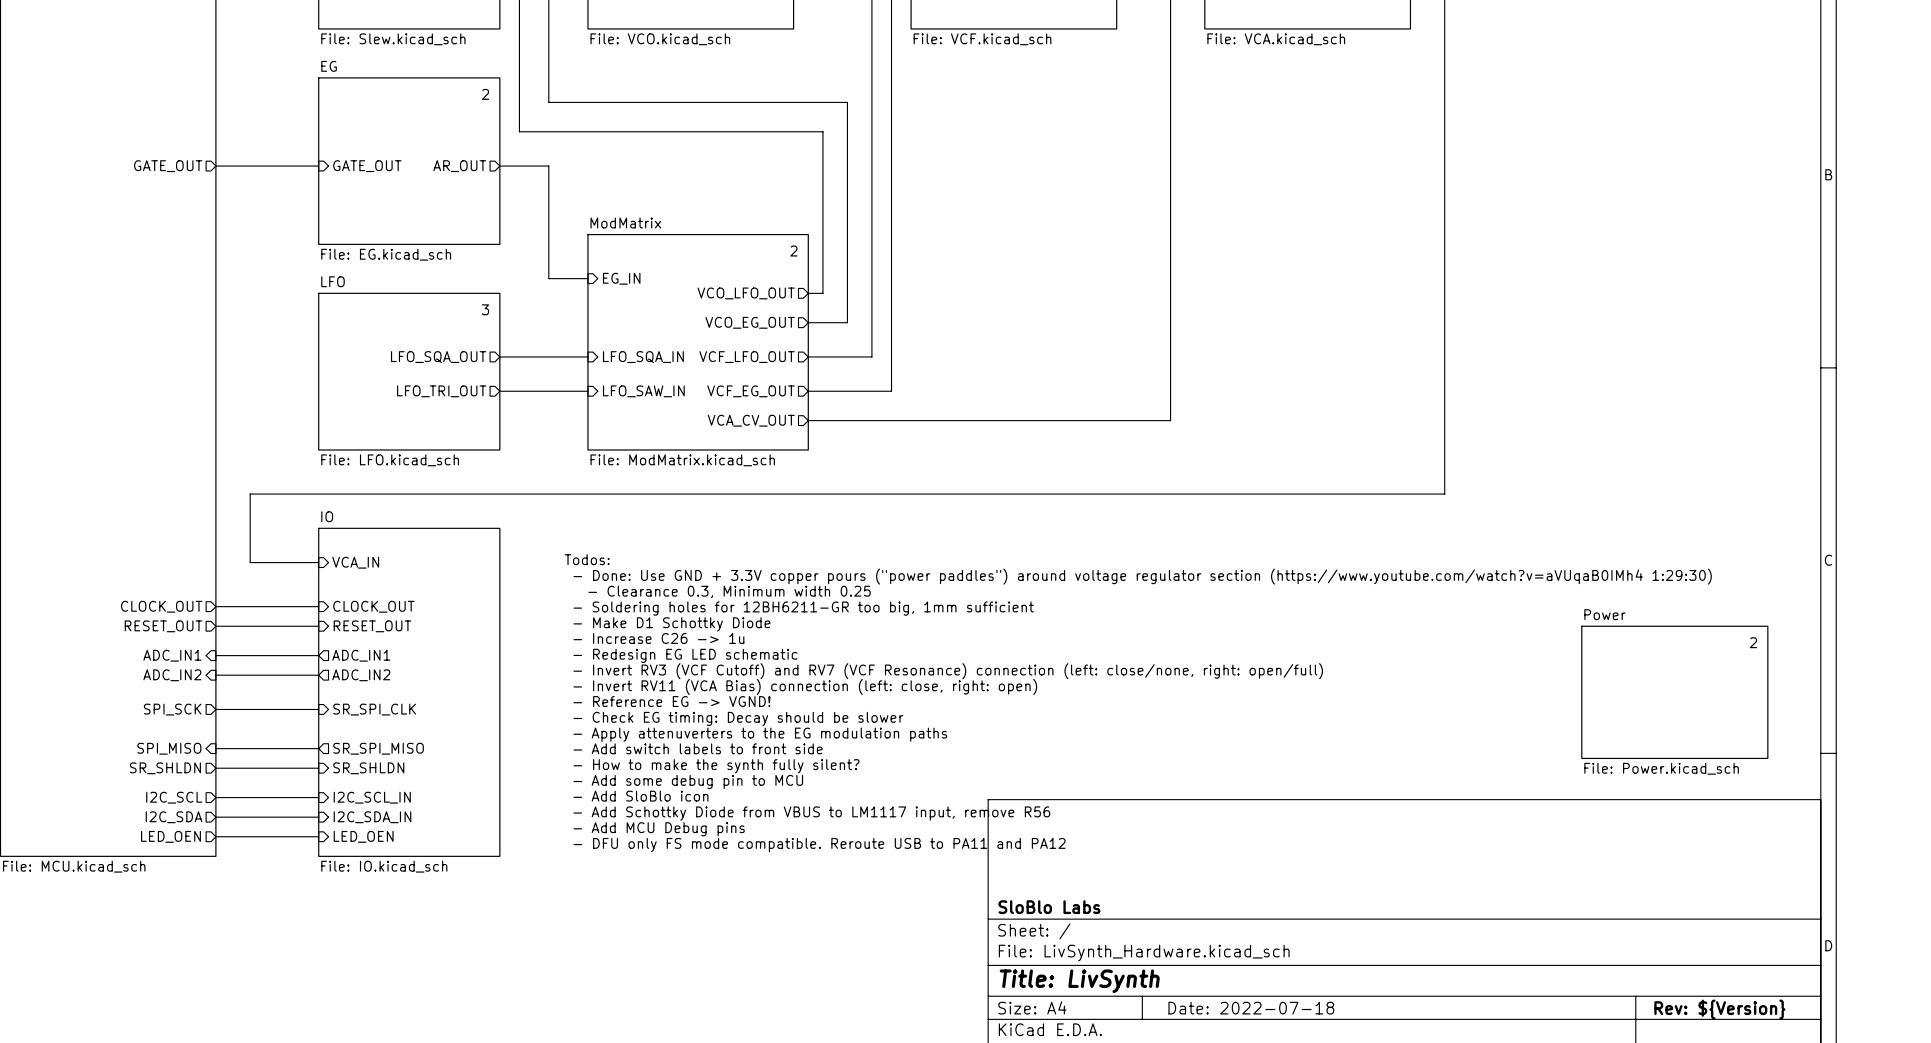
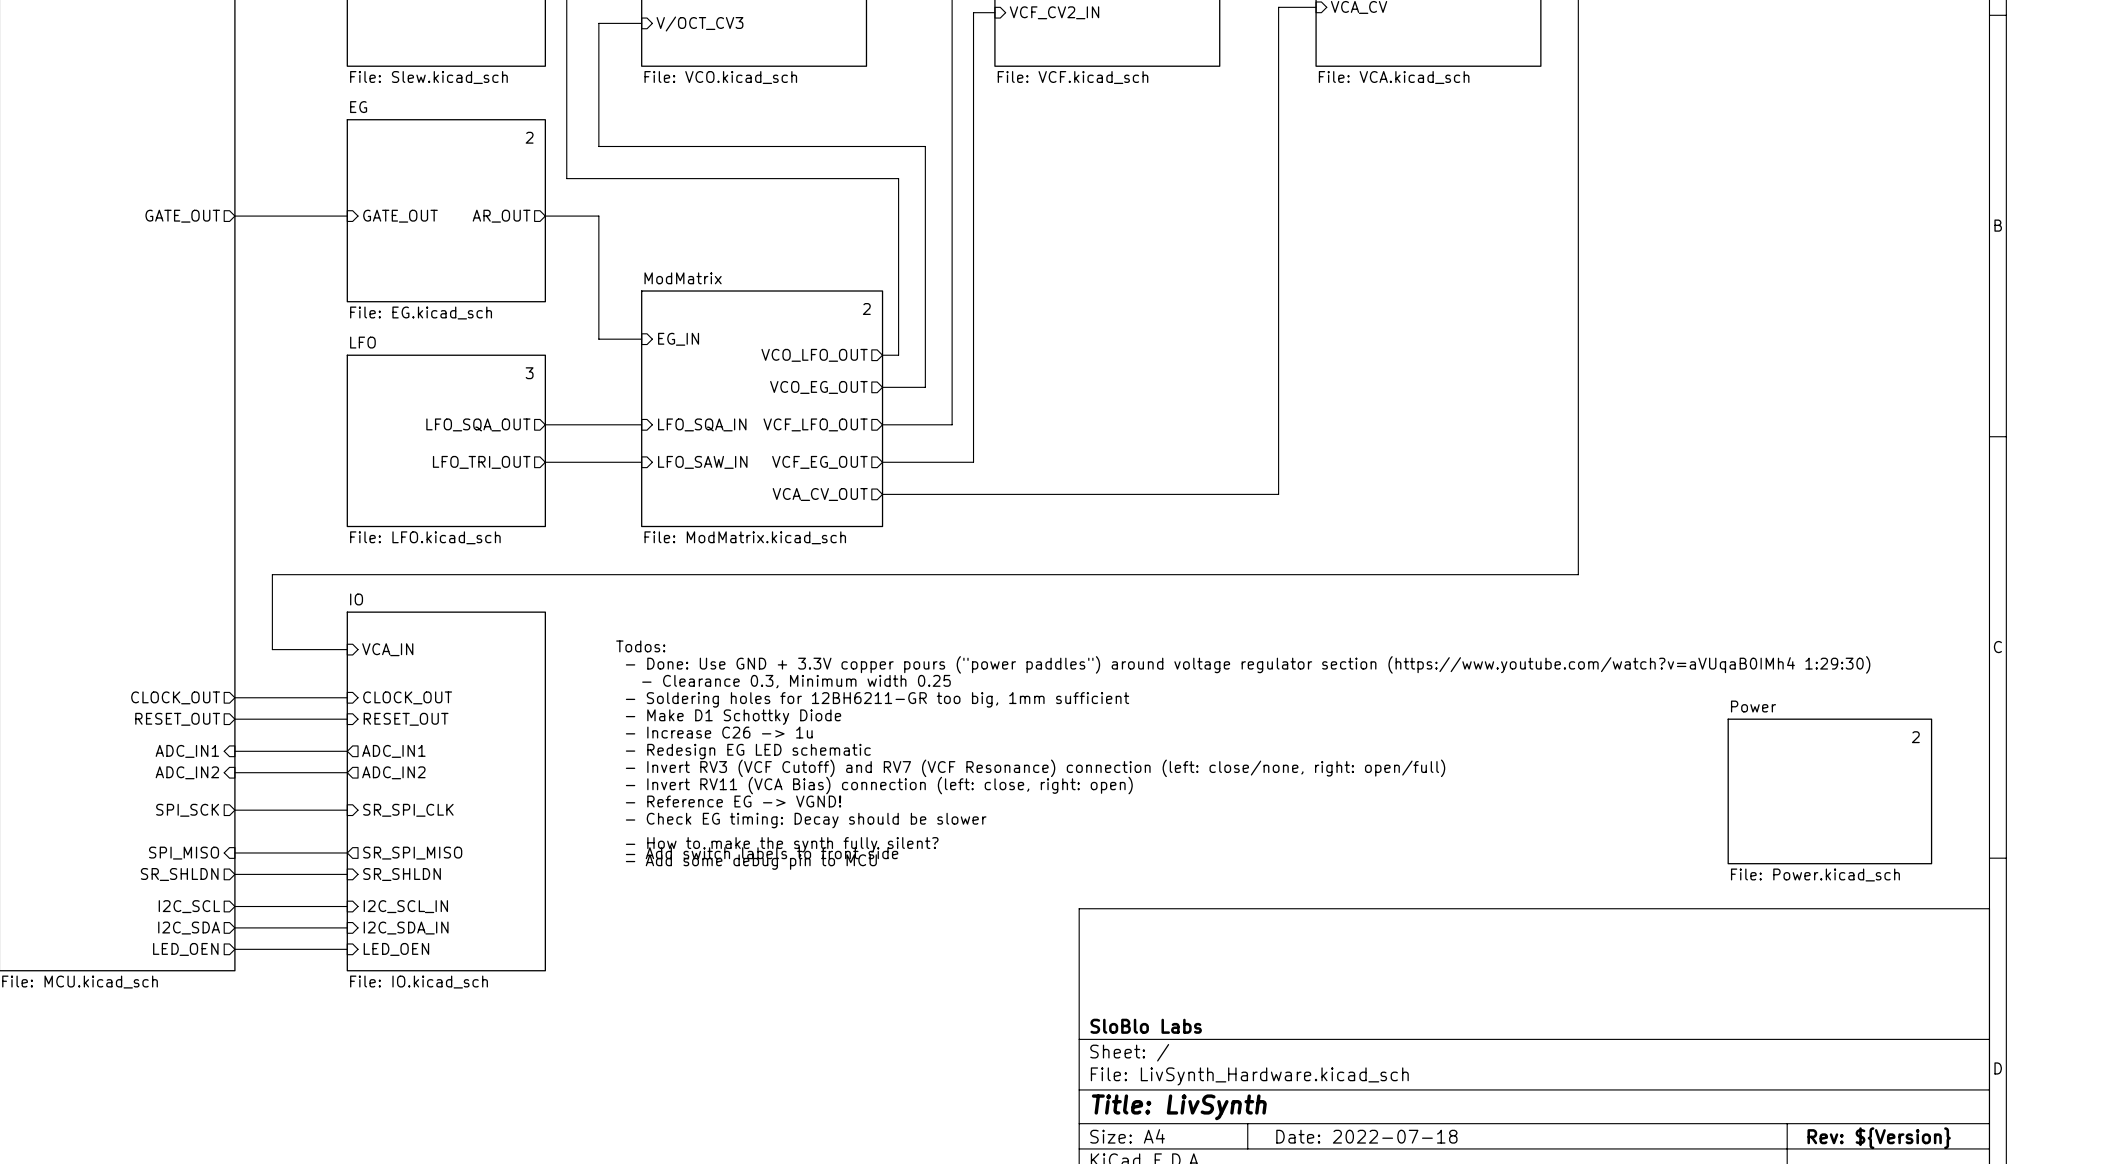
text: - Apply attenuverters to the EG modulation paths (760, 734) -> none
text position: - How to make the synth fully silent? (716, 766) -> - How to make the synth fully silent? (782, 844)
text position: - Add some debug pin to MCU (688, 782) -> - Add some debug pin to MCU (751, 862)
text: - Add SloBlo icon (640, 796) -> none
text: - Add Schottky Diode from VBUS to LM1117 input, remove R56 (811, 813) -> none
text: - Add MCU Debug pins (659, 829) -> none
text: - DFU only FS mode compatible. Reroute USB to PA11 and PA12 (819, 845) -> none

